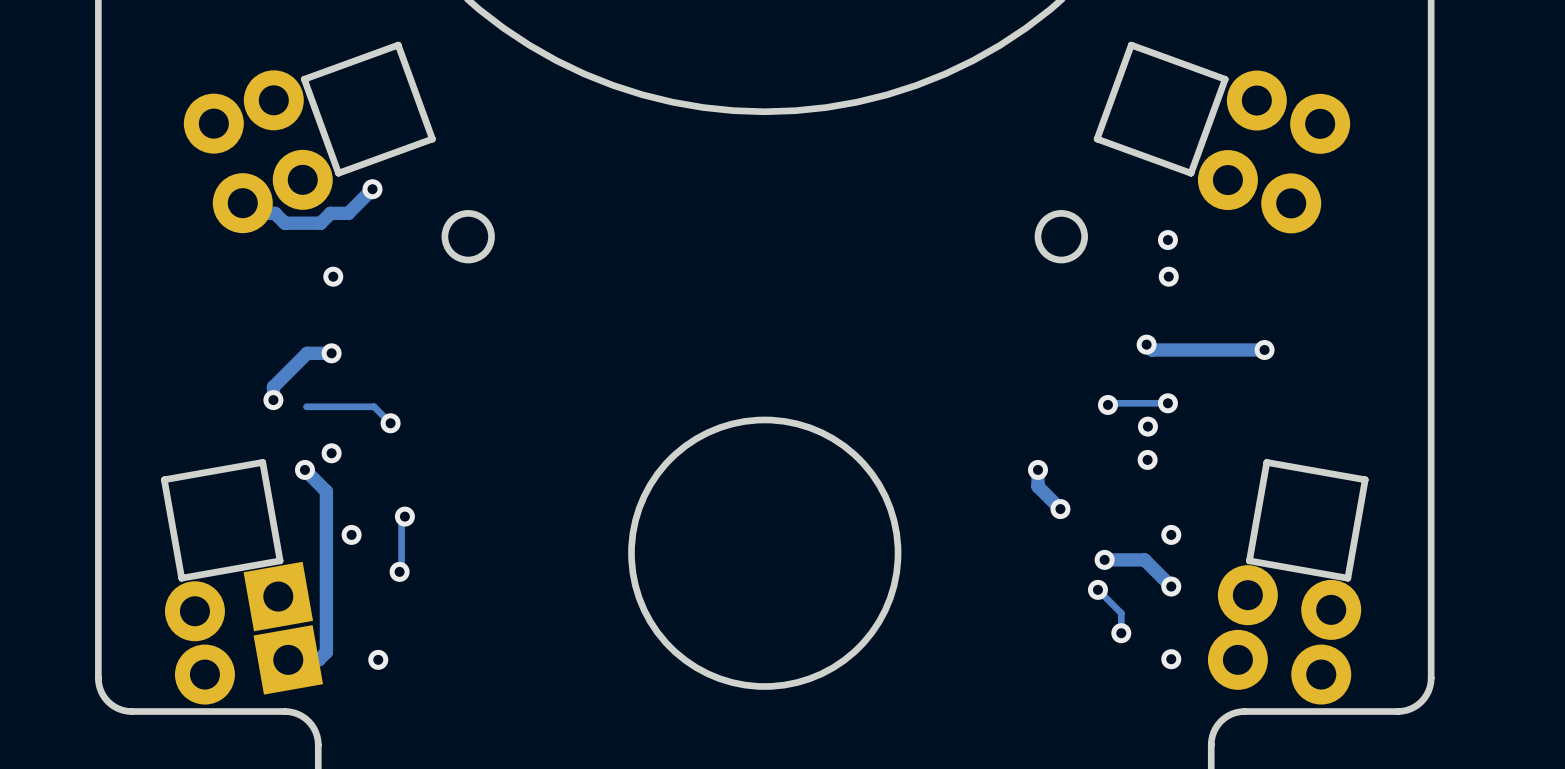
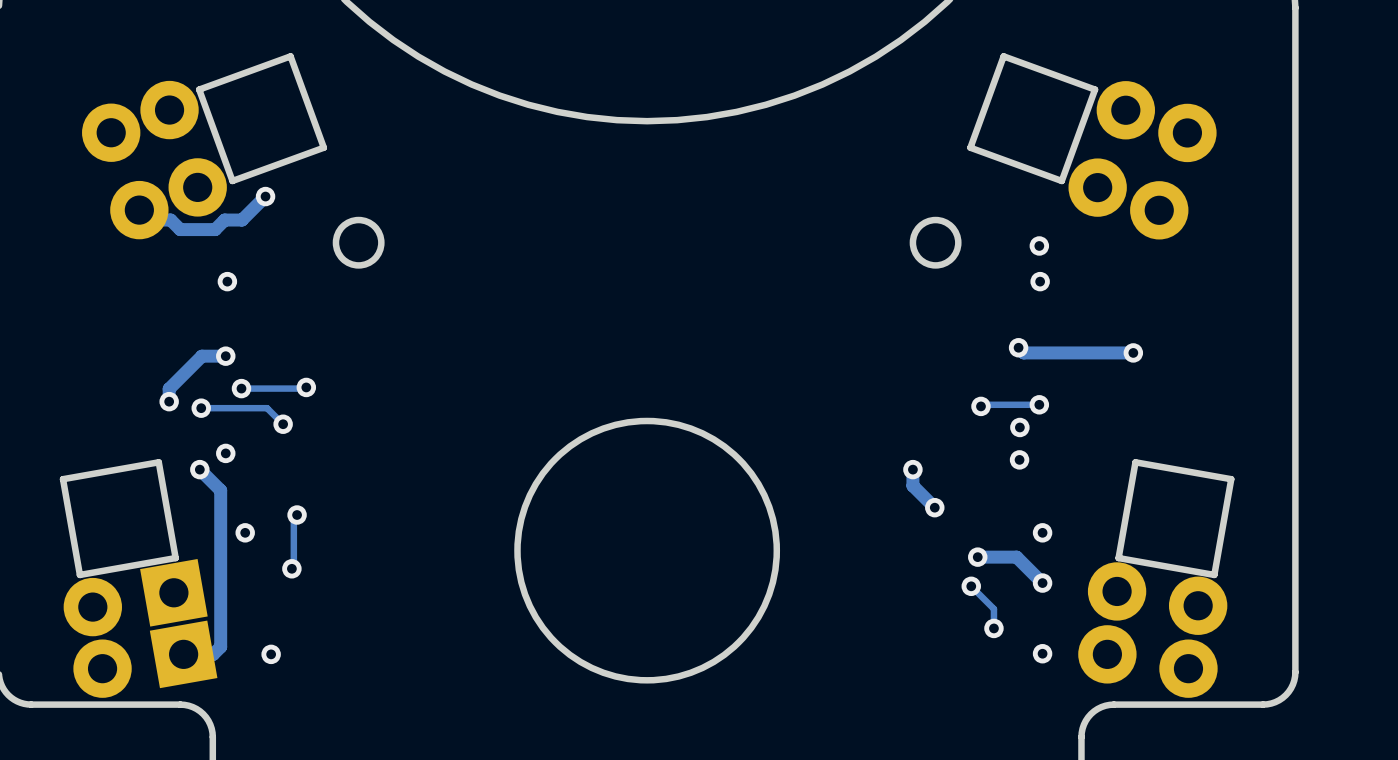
track: none -> (306, 387) (241, 388)
via: none -> (306, 387)
via: none -> (241, 388)
via: none -> (201, 408)

